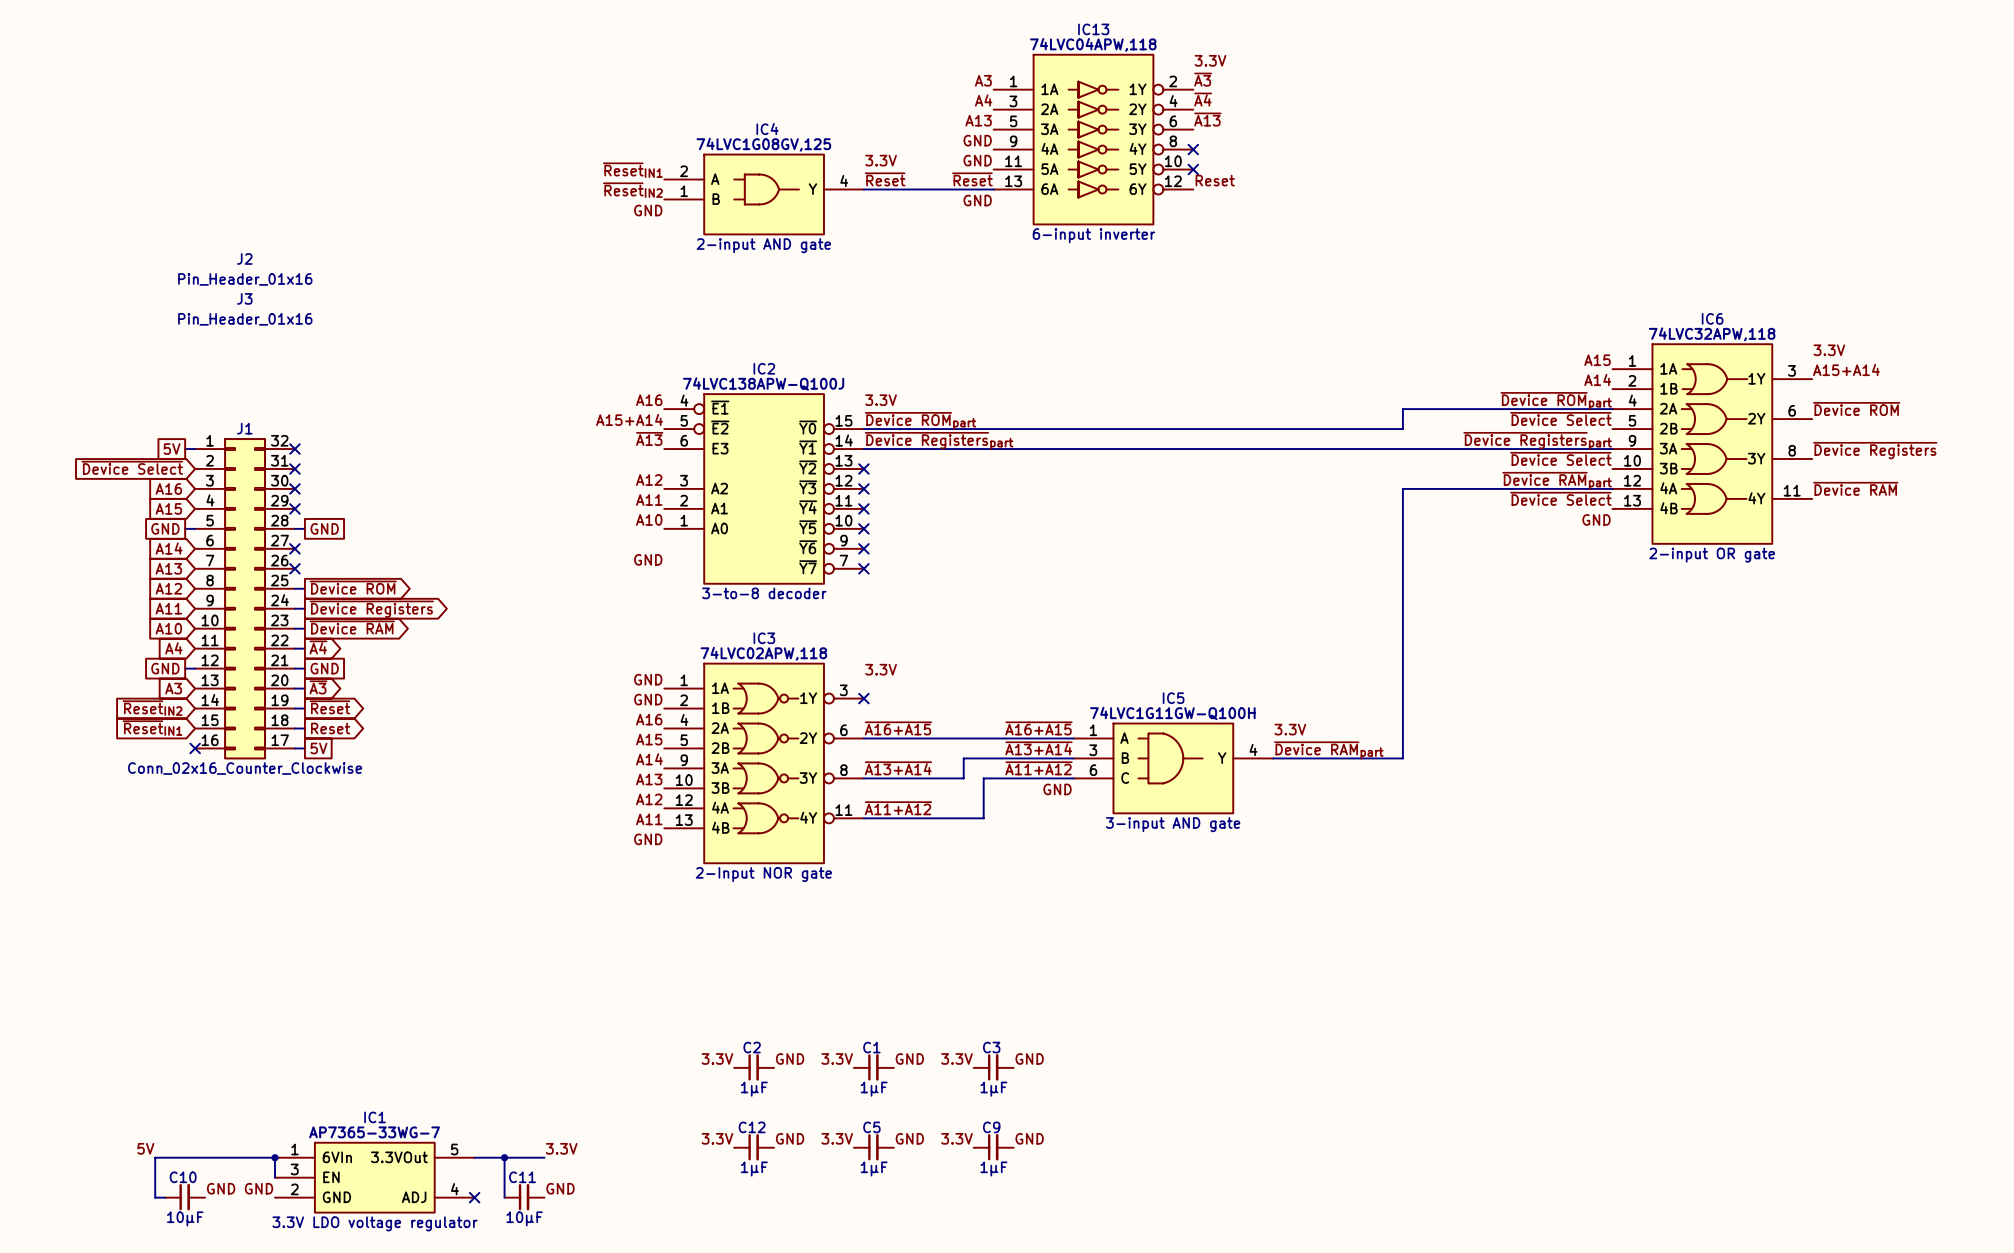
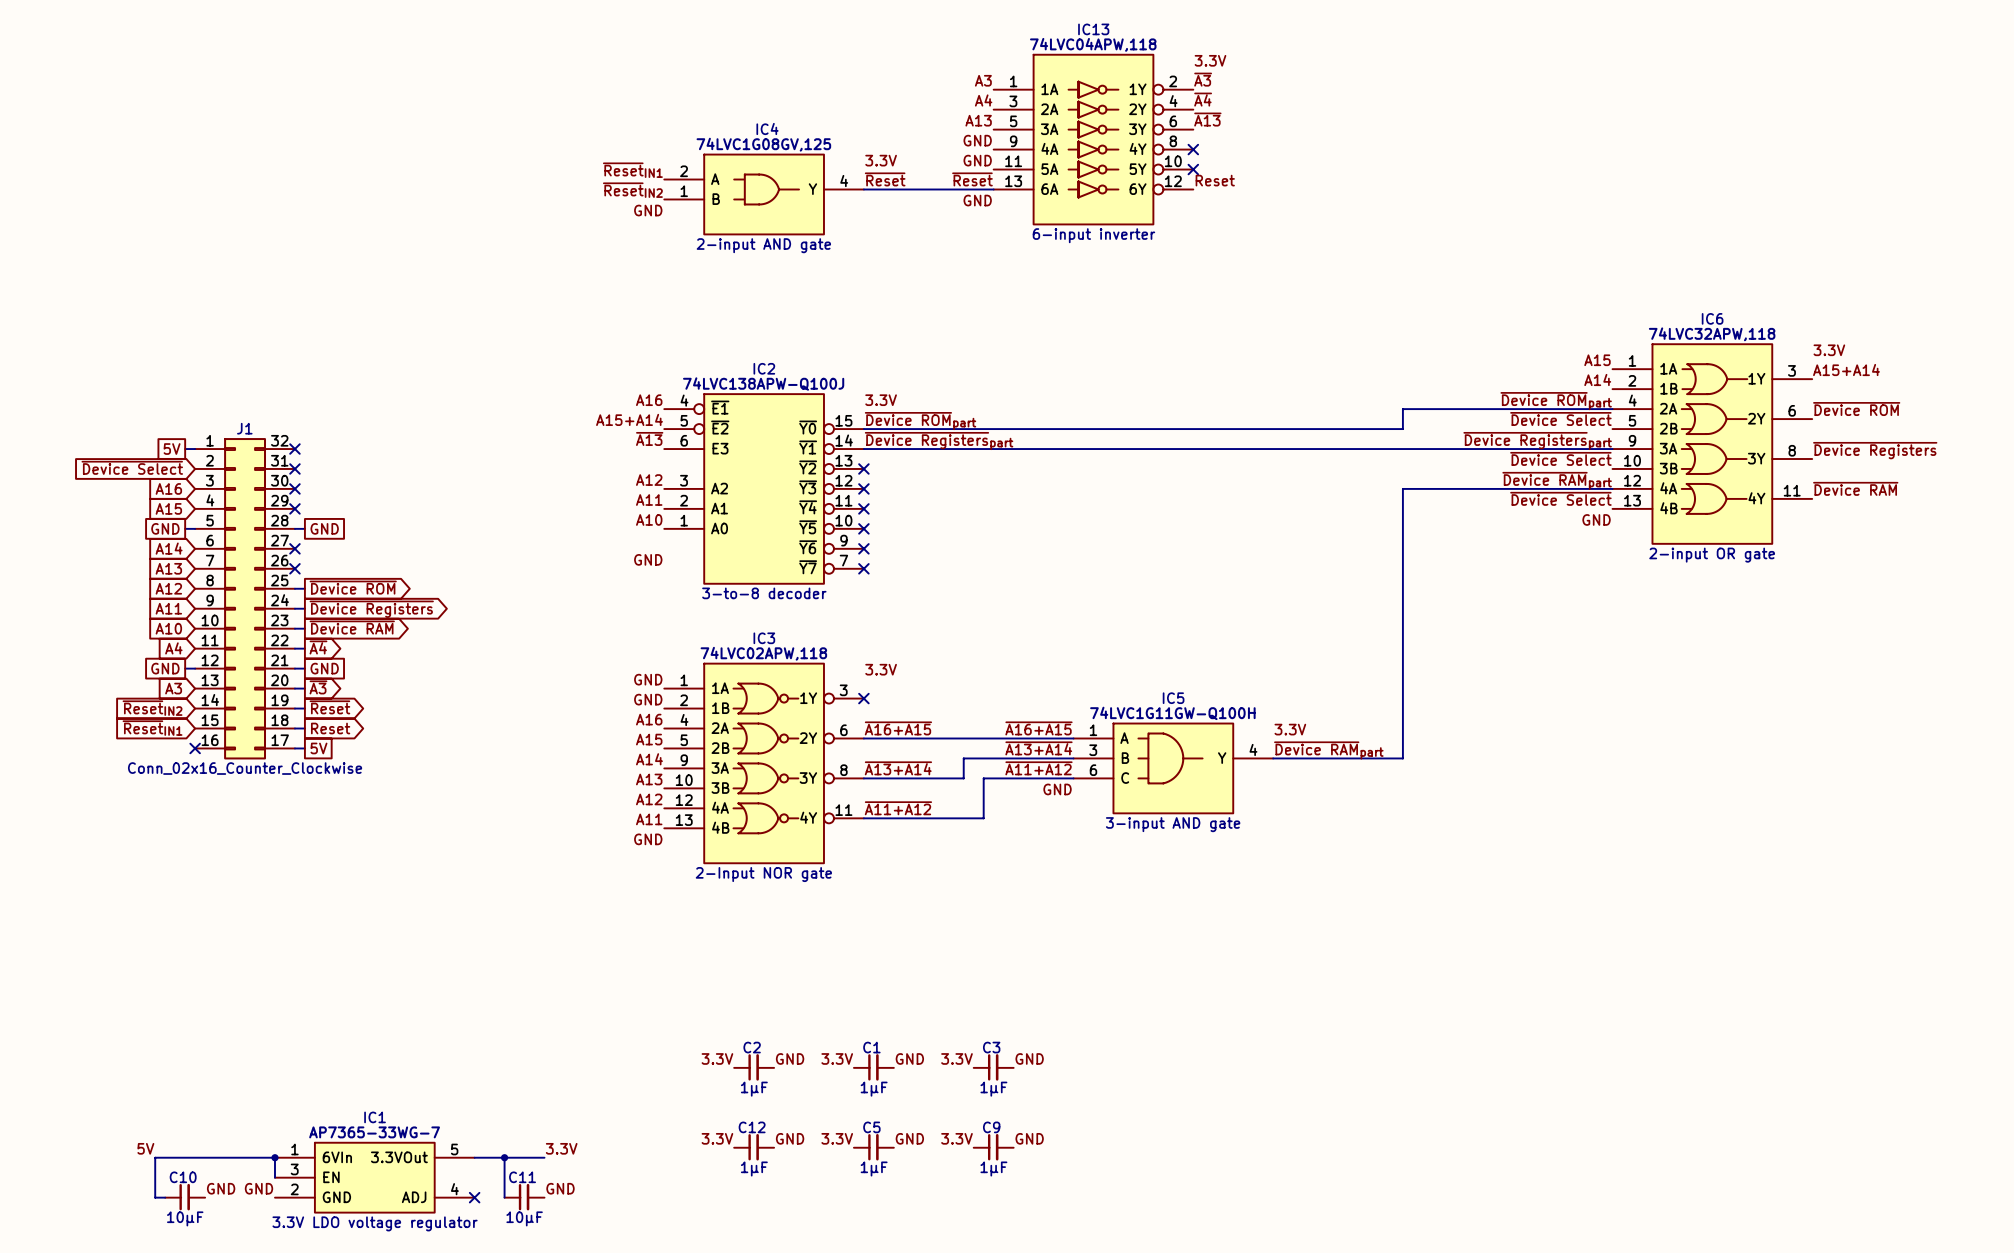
J2: Pin_Header_01x16 (245, 269) -> none
J3: Pin_Header_01x16 (245, 309) -> none

